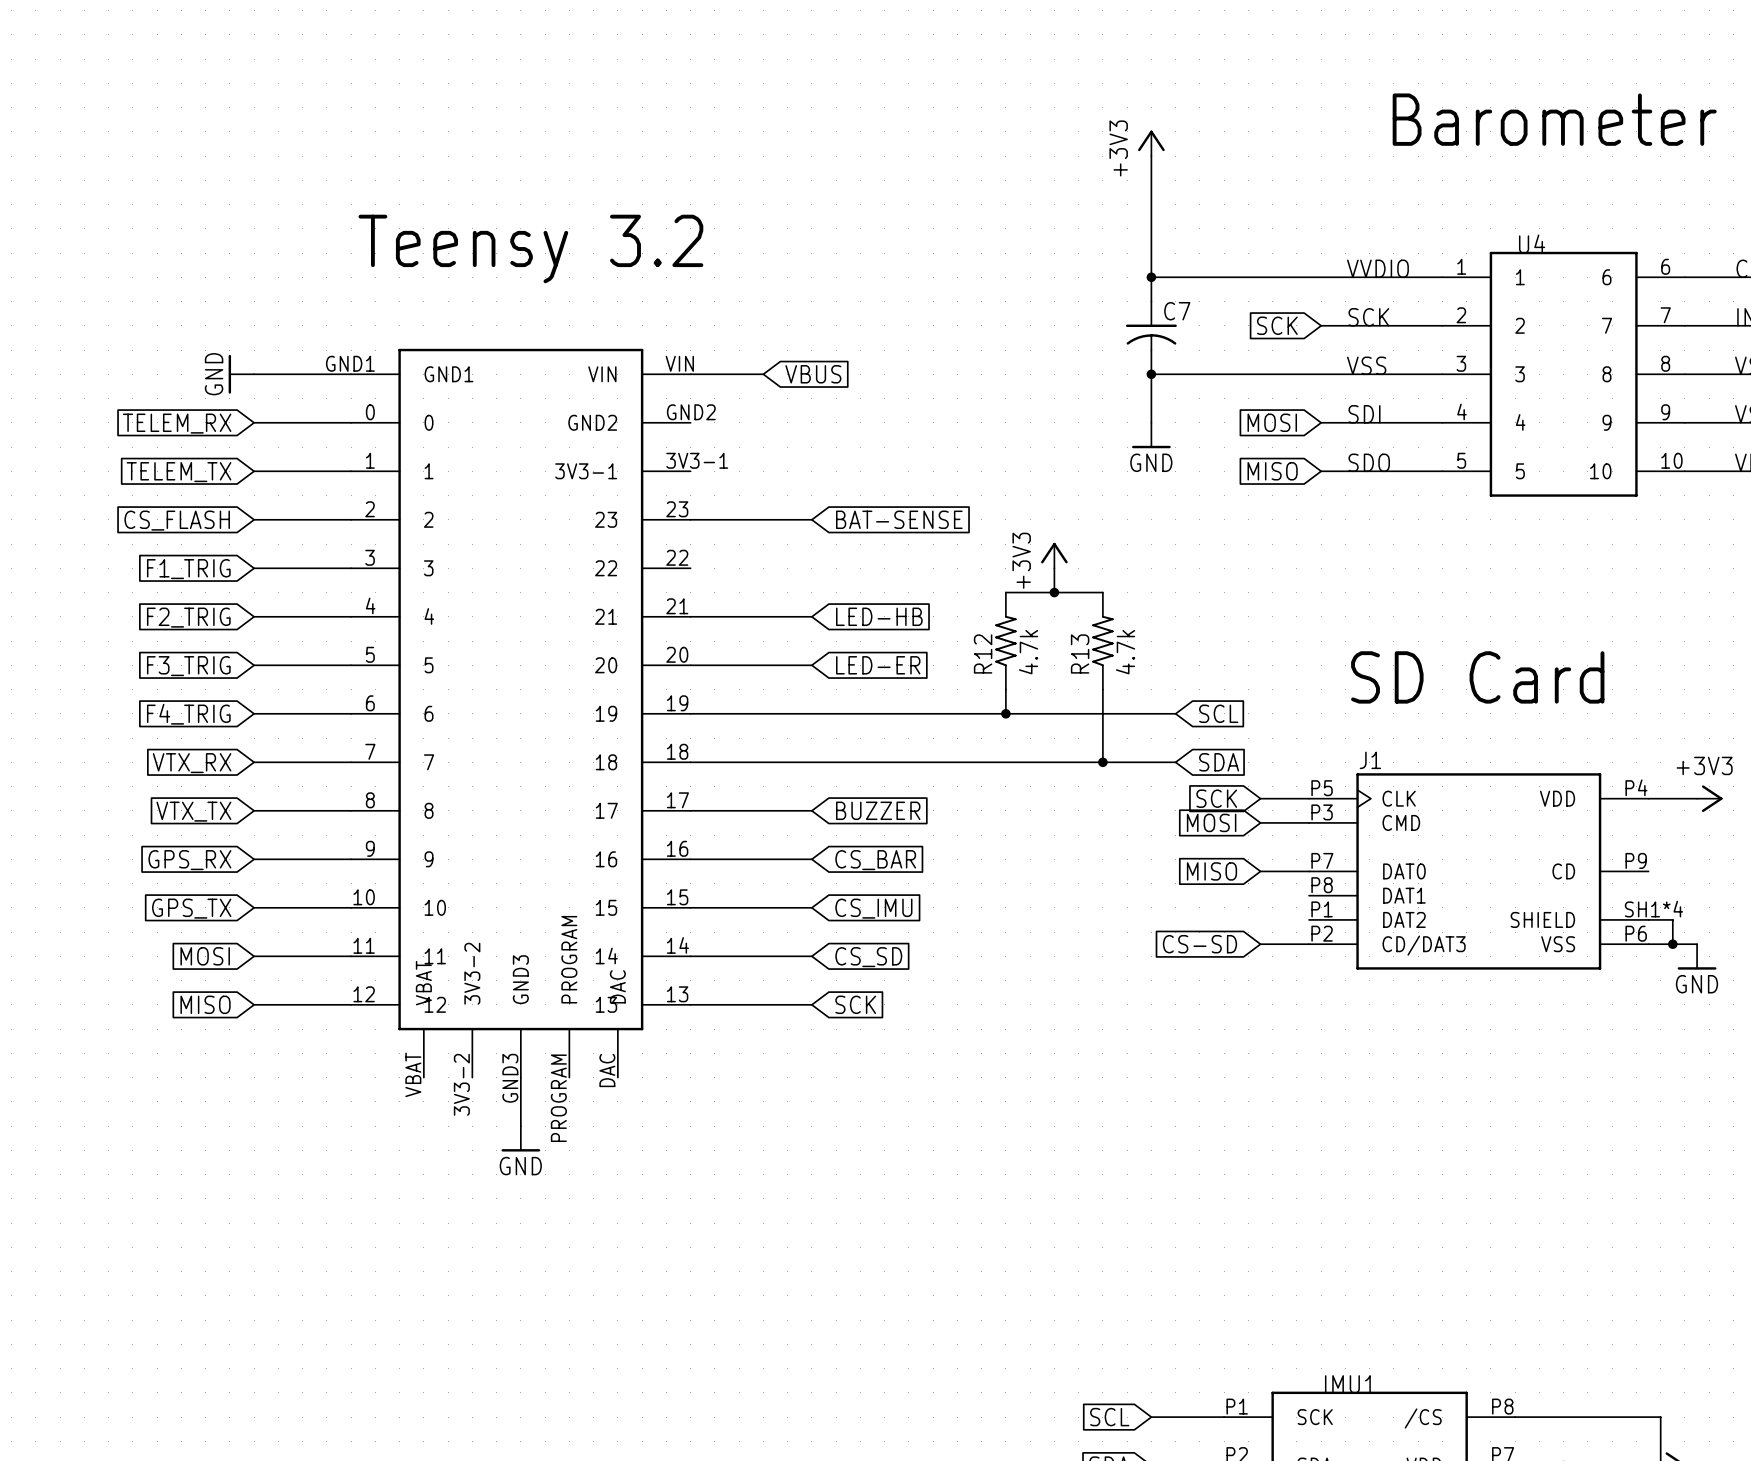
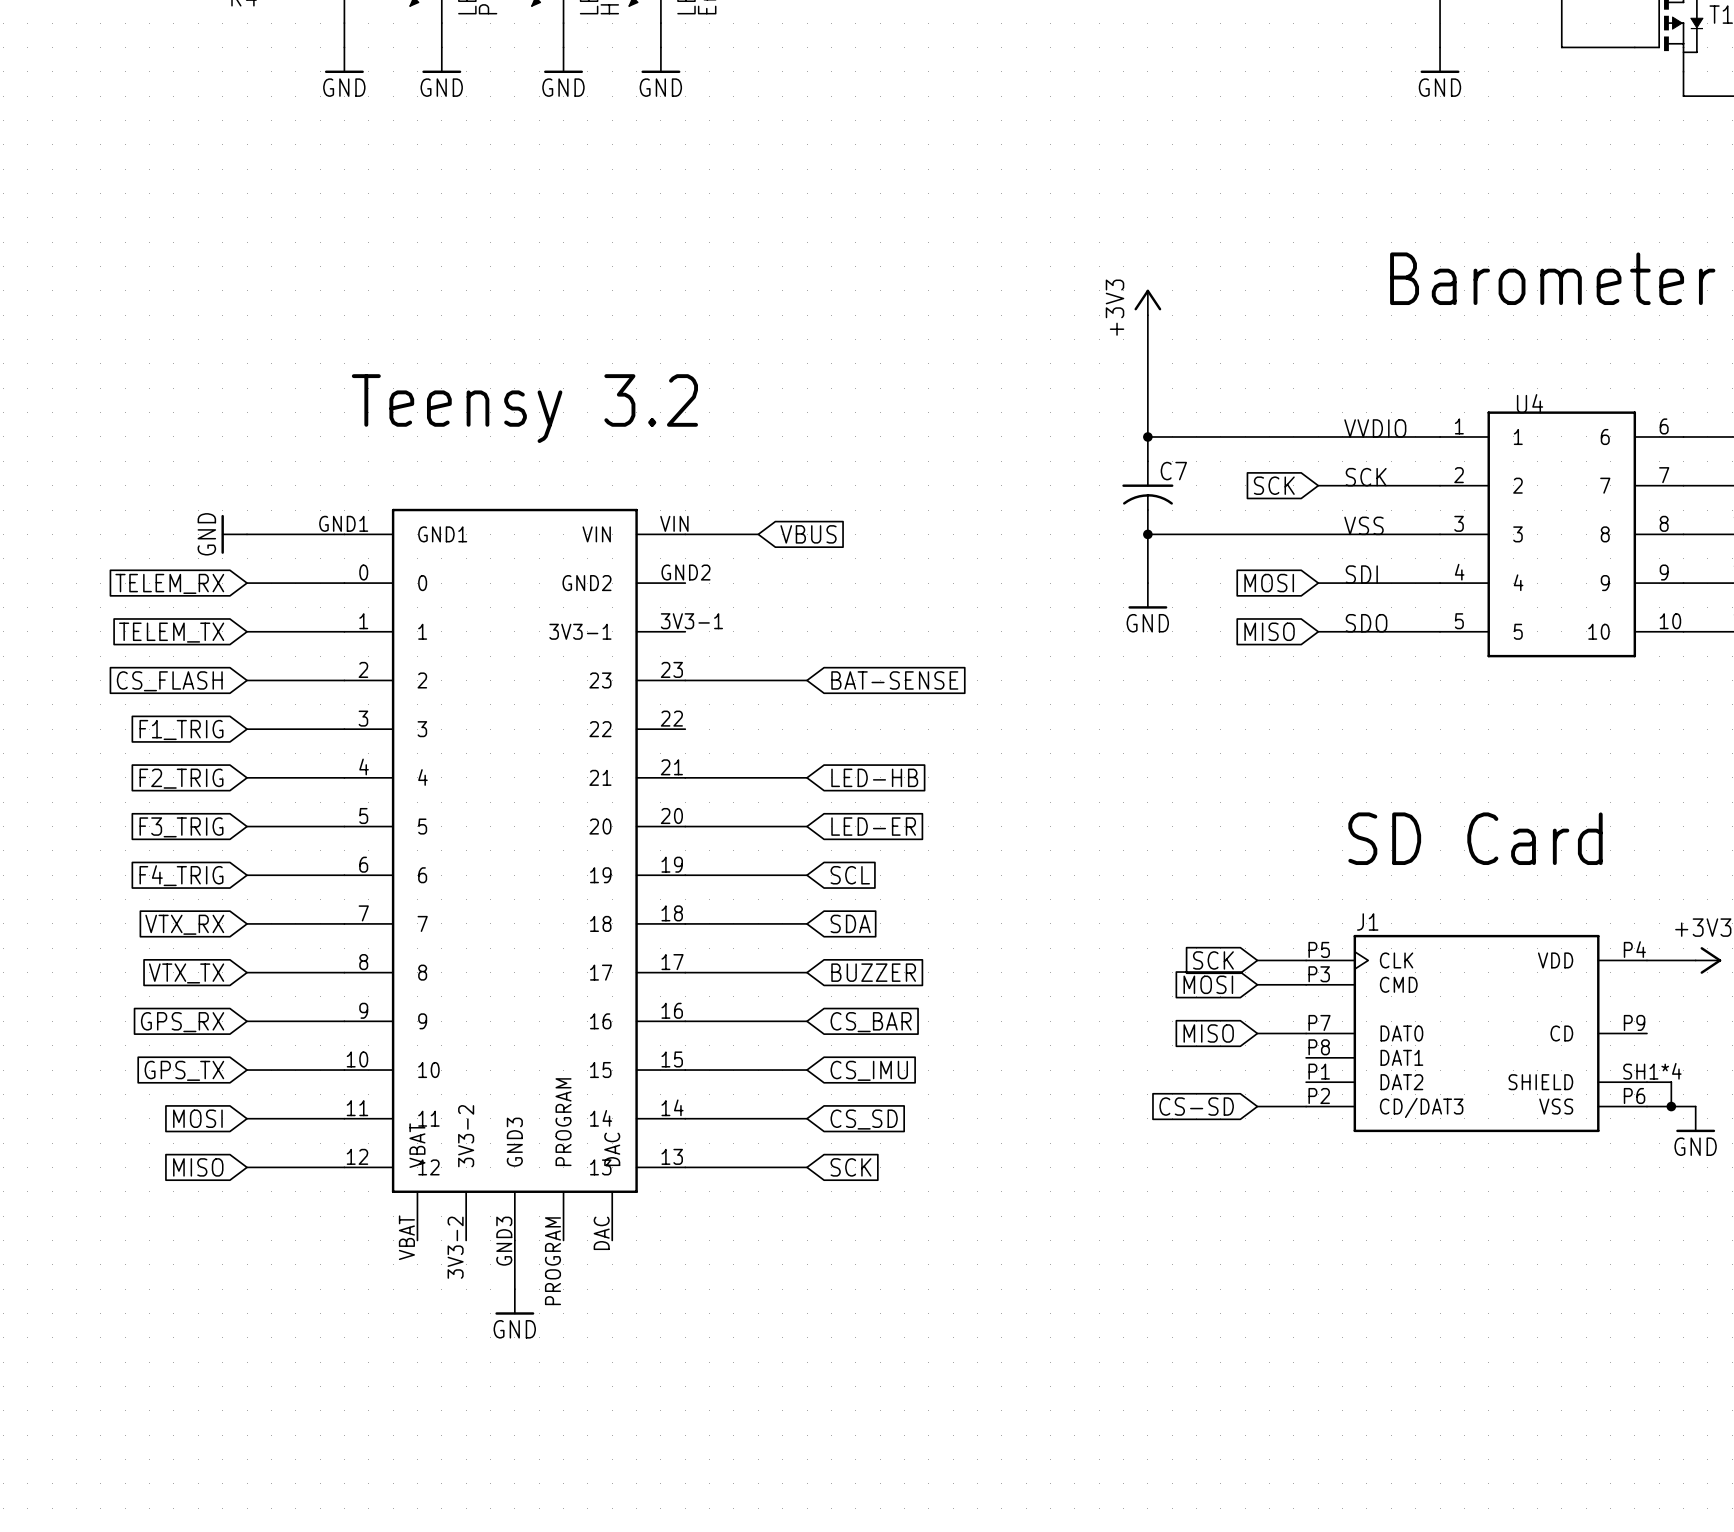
power symbol: +3V3 (1054, 555) -> none
wire: (1054, 568) (1054, 592) -> none
wire: (1005, 592) (1102, 592) -> none
junction: (1054, 592) -> none
R12: 4.7k (1005, 641) -> none
R13: 4.7k (1102, 641) -> none
wire: (1005, 689) (1005, 713) -> none
wire: (1102, 689) (1102, 762) -> none
wire: (811, 713) (1175, 713) -> none
global label: none -> SCL (850, 875)
junction: (1005, 713) -> none
global label: SCL (1218, 713) -> none
wire: (811, 762) (1175, 762) -> none
global label: none -> SDA (850, 923)
junction: (1102, 762) -> none
global label: SDA (1219, 762) -> none

